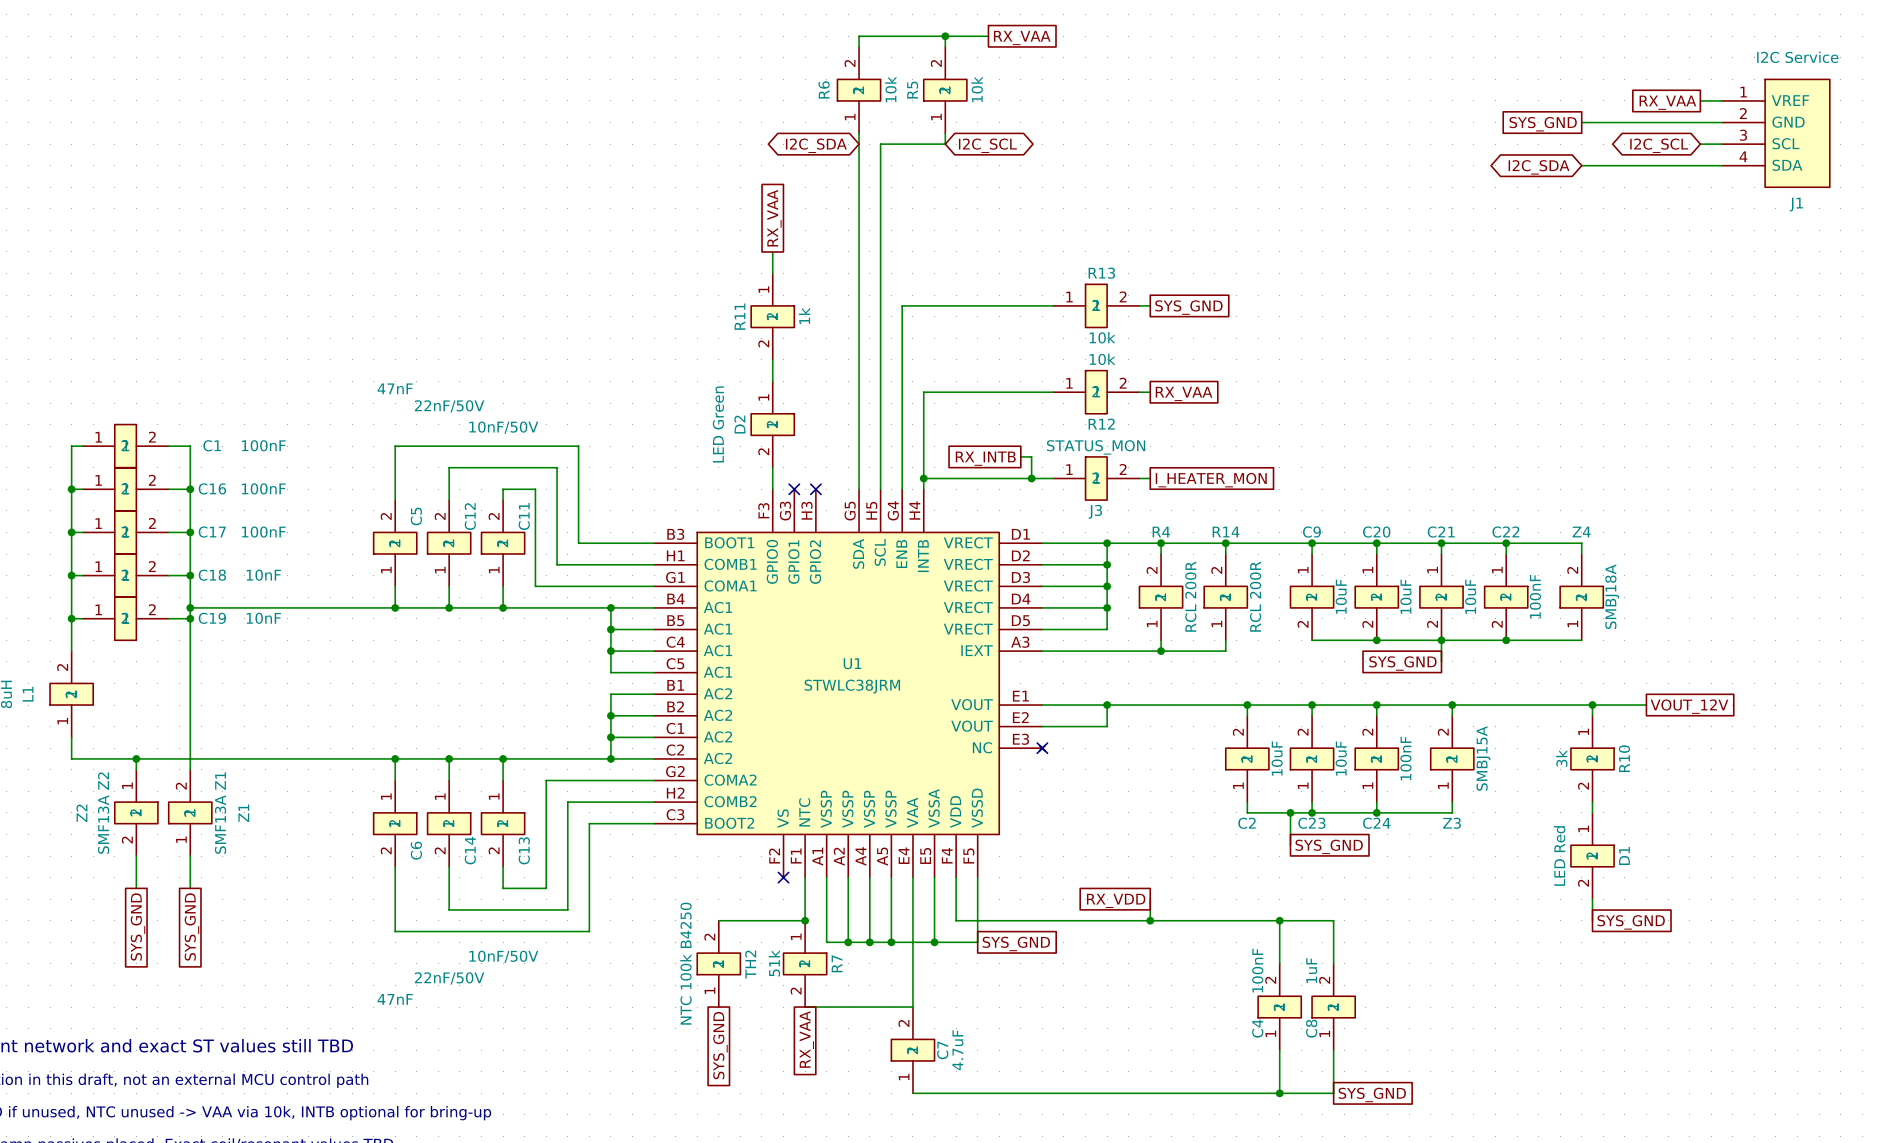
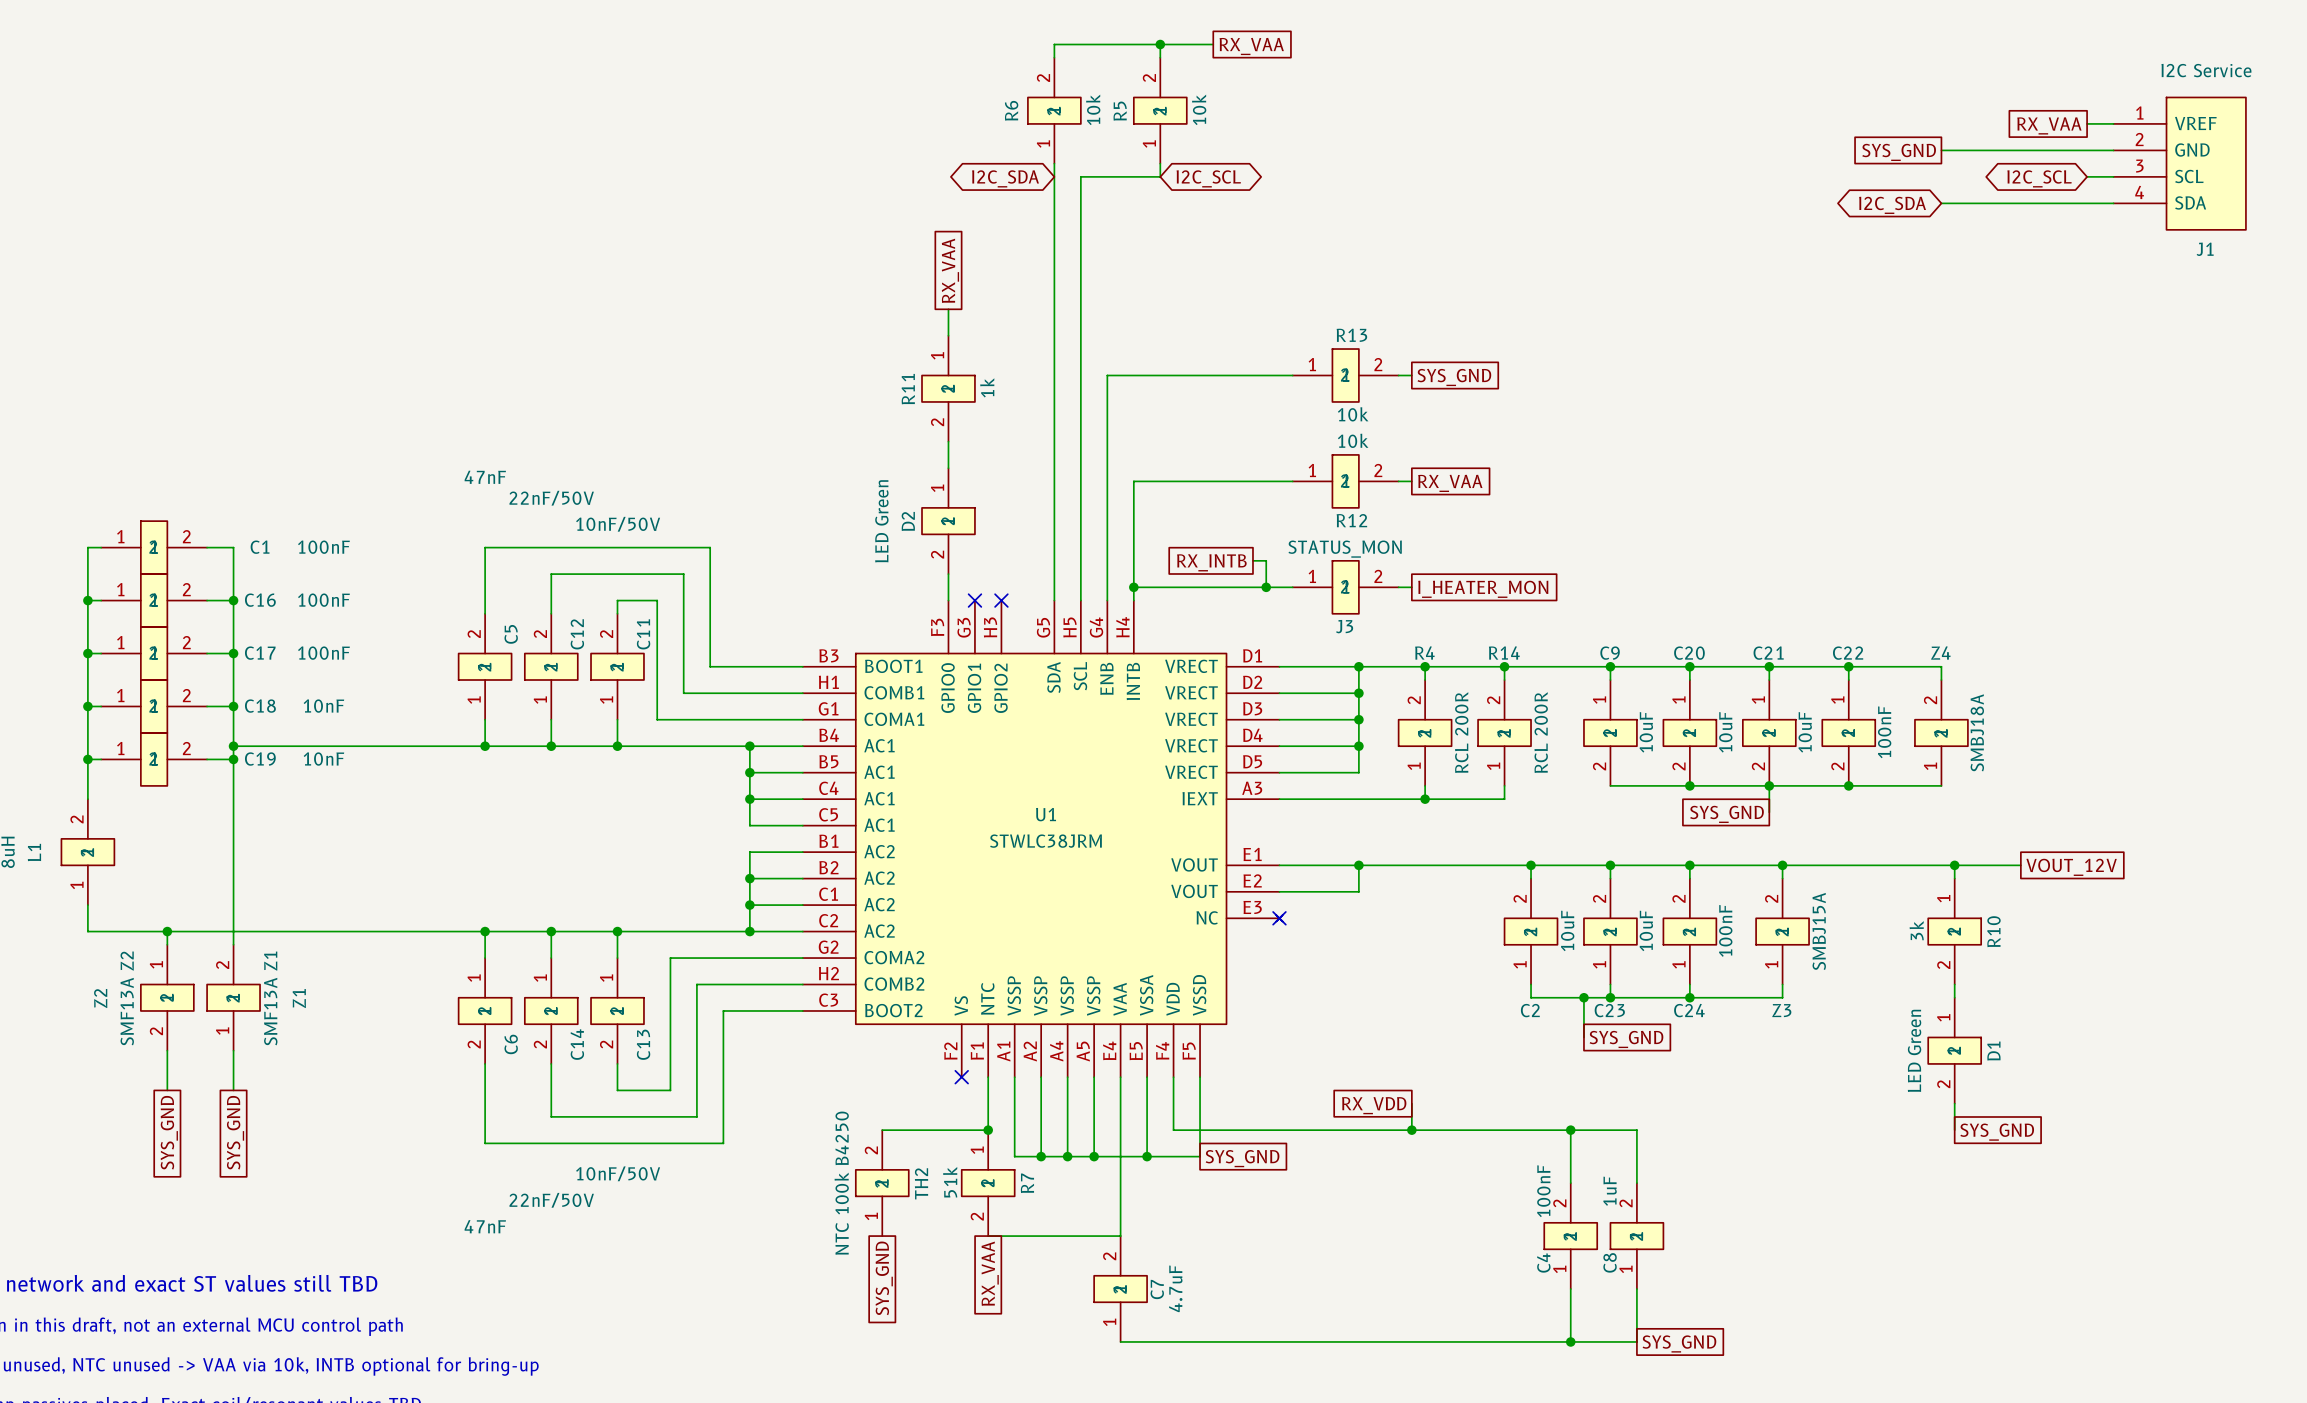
D1 value: LED Red (1559, 855) -> LED Green (1914, 1050)

